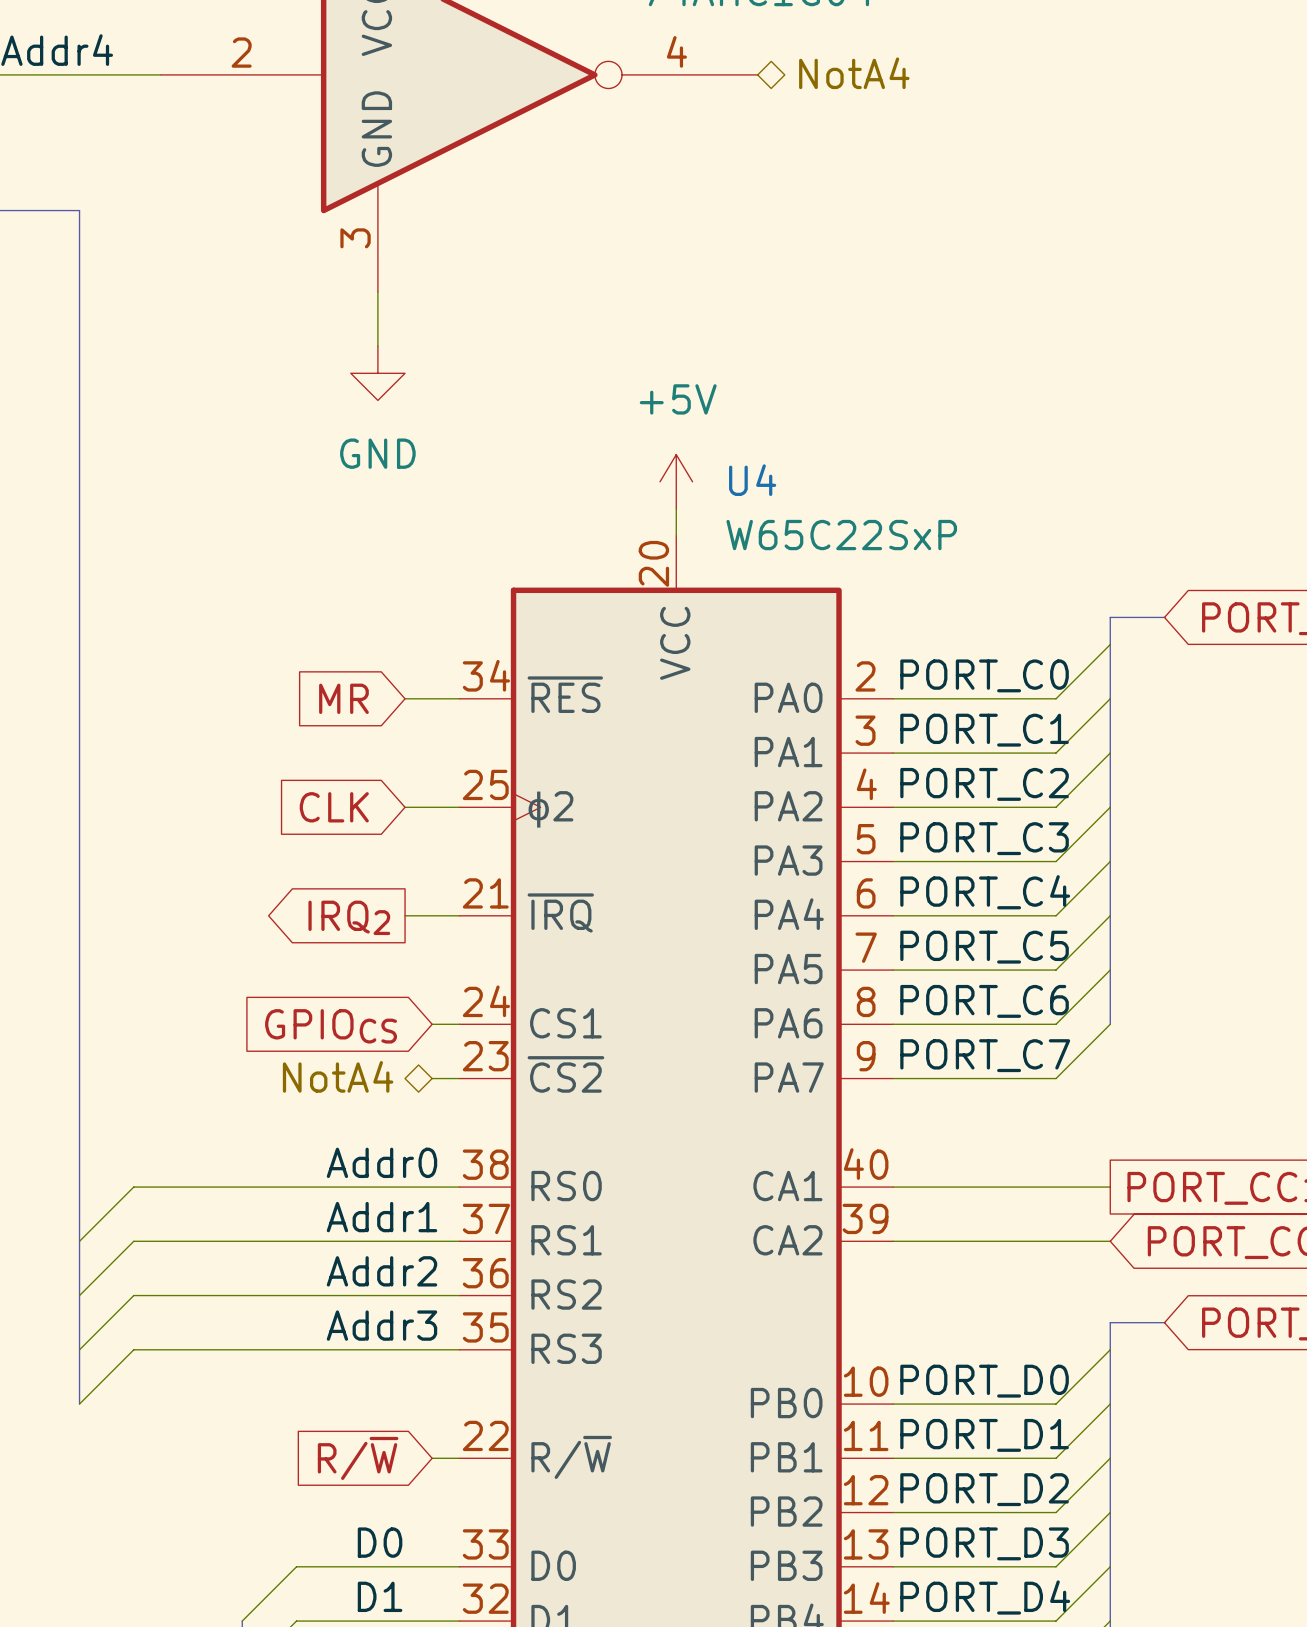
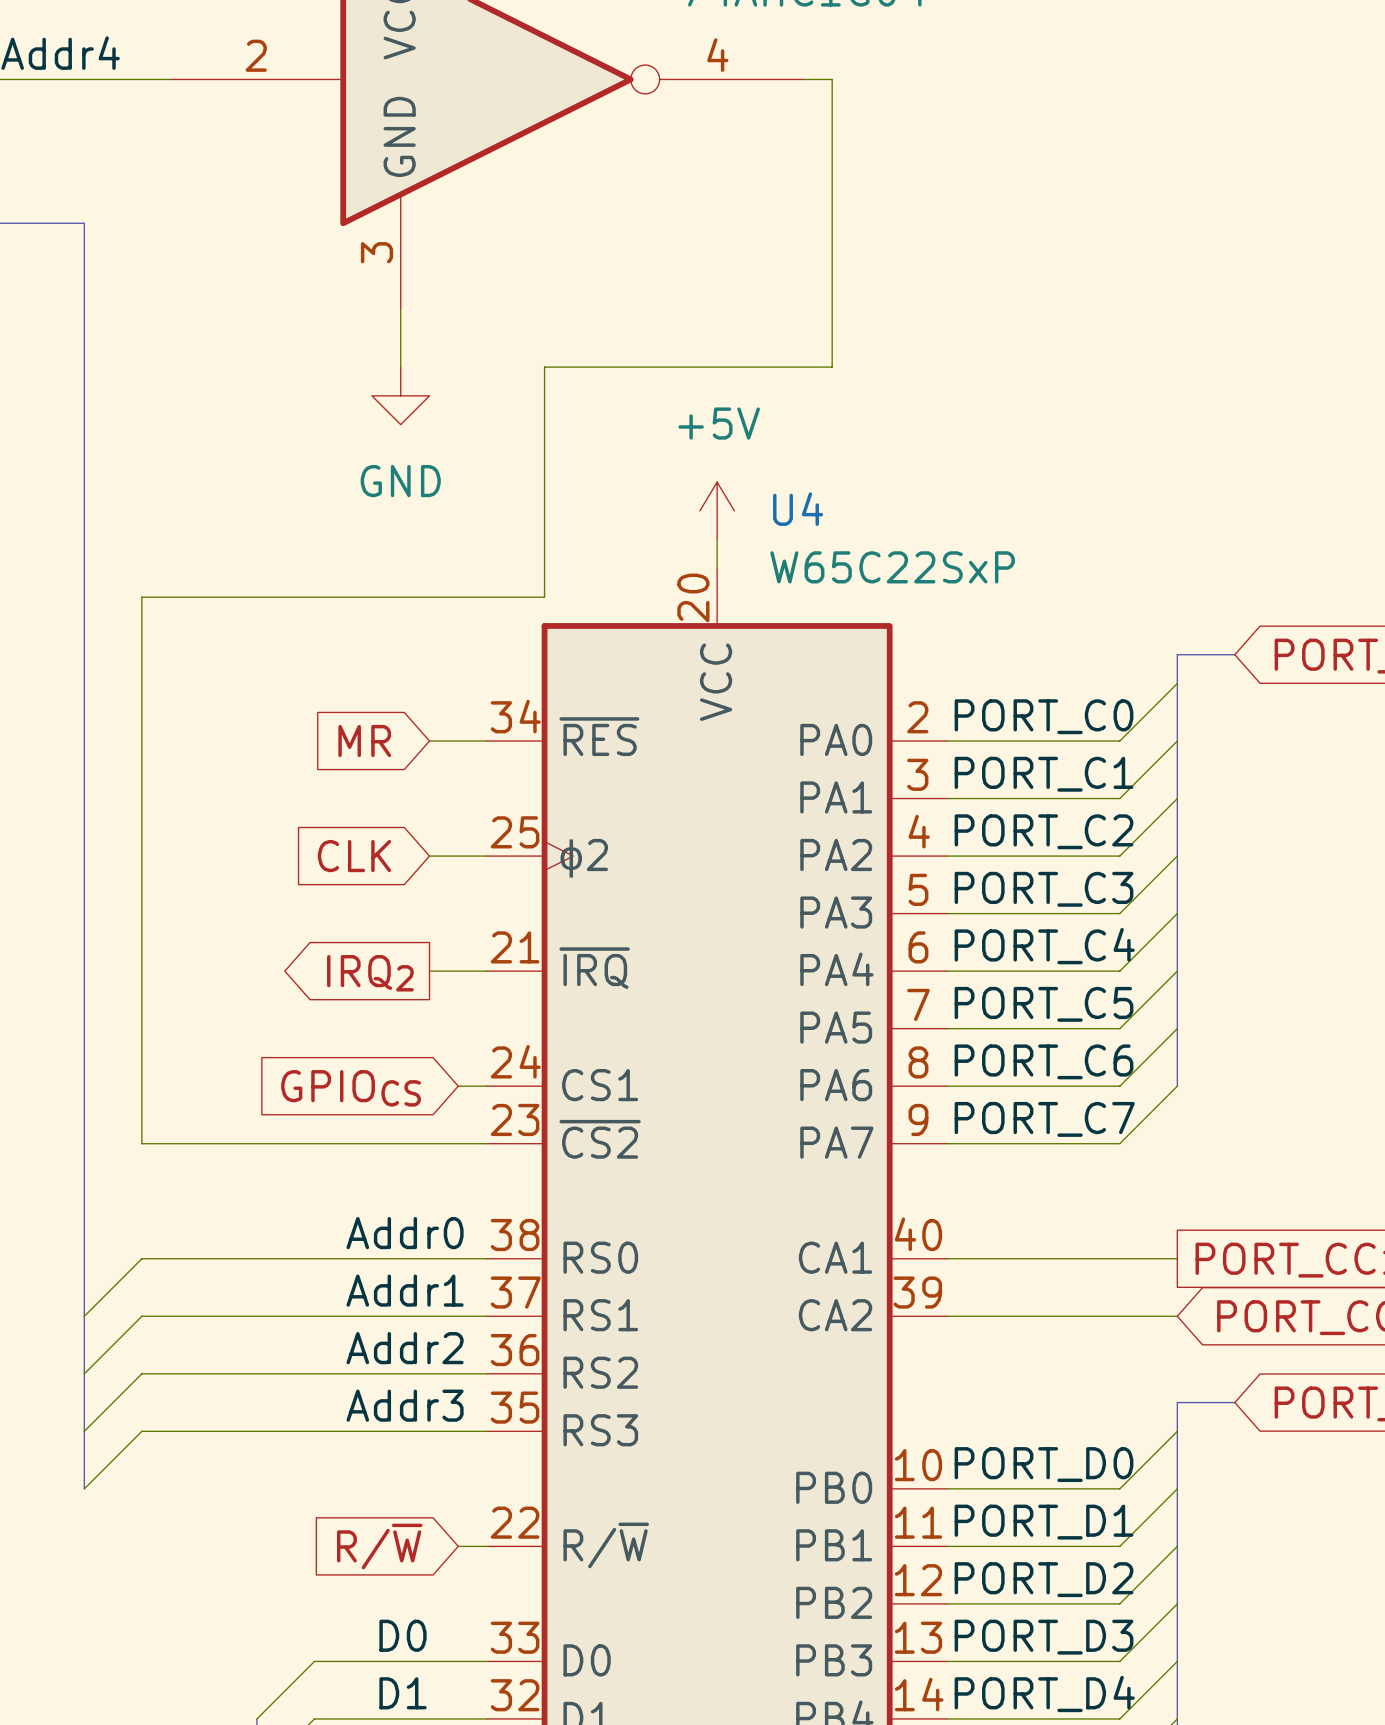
hierarchical label: NotA4 (854, 73) -> none
wire: none -> (803, 79) (832, 79) (832, 367) (544, 367) (544, 597) (141, 597) (141, 1143) (458, 1143)
hierarchical label: NotA4 (338, 1076) -> none

